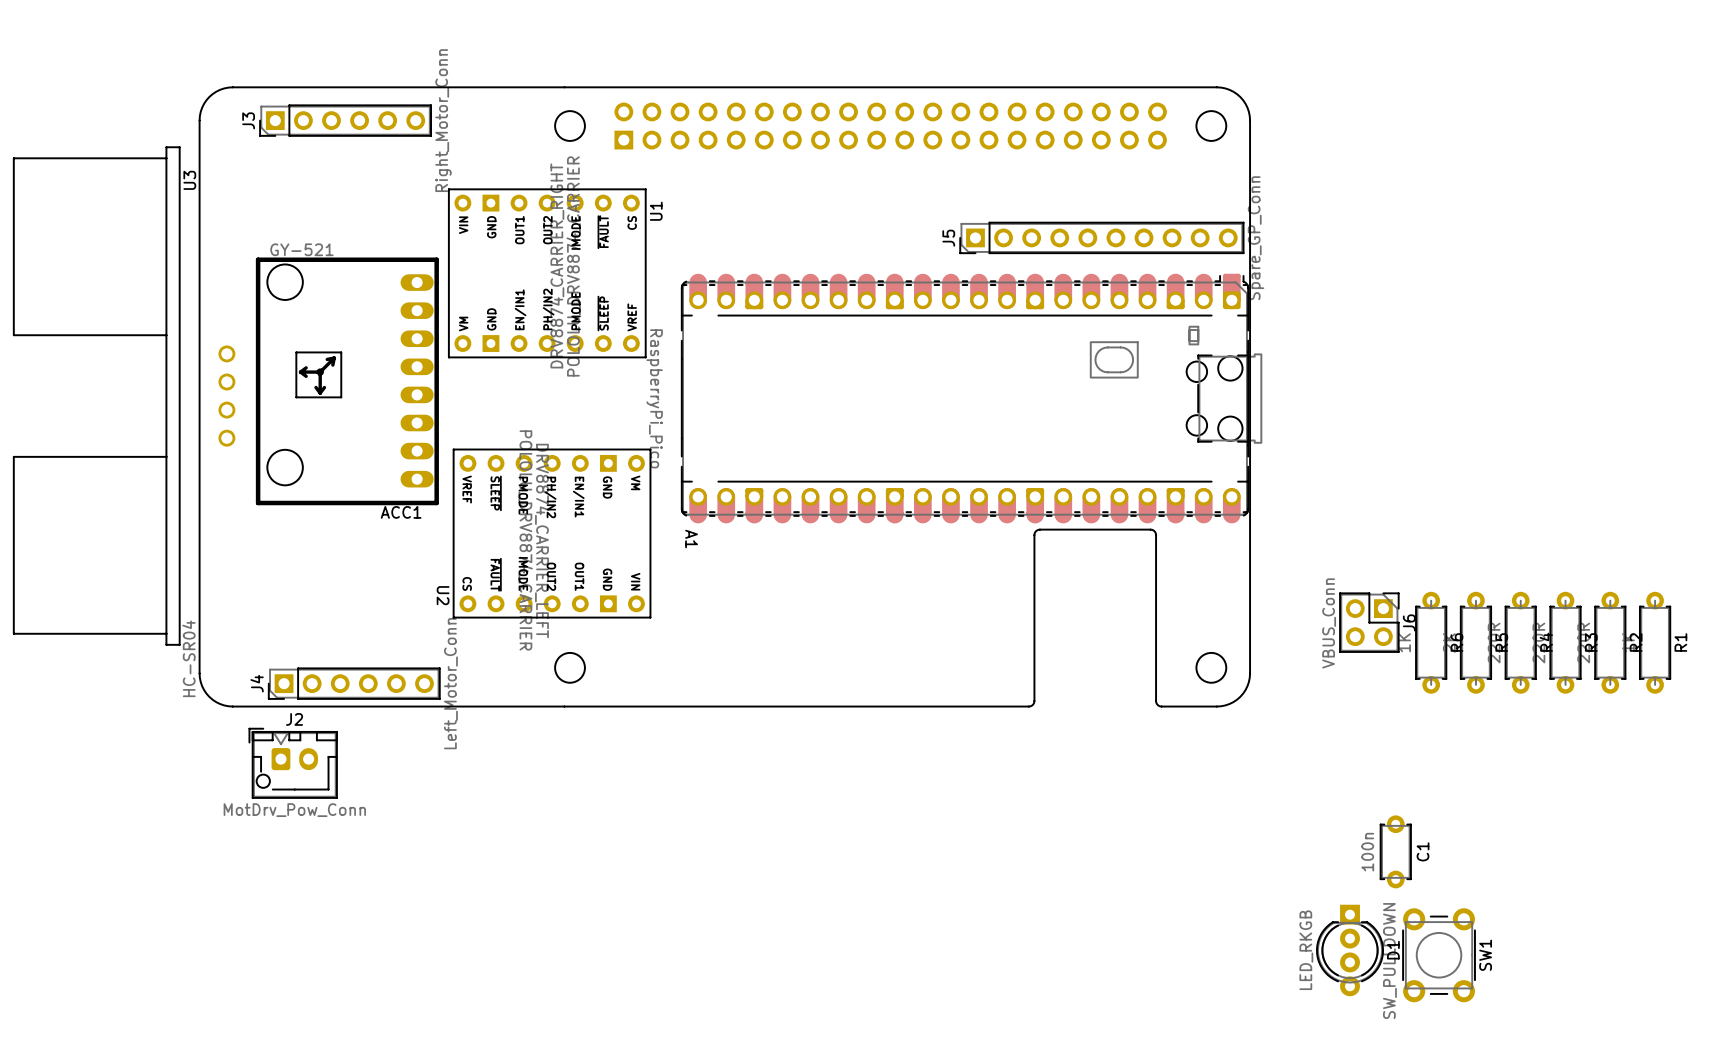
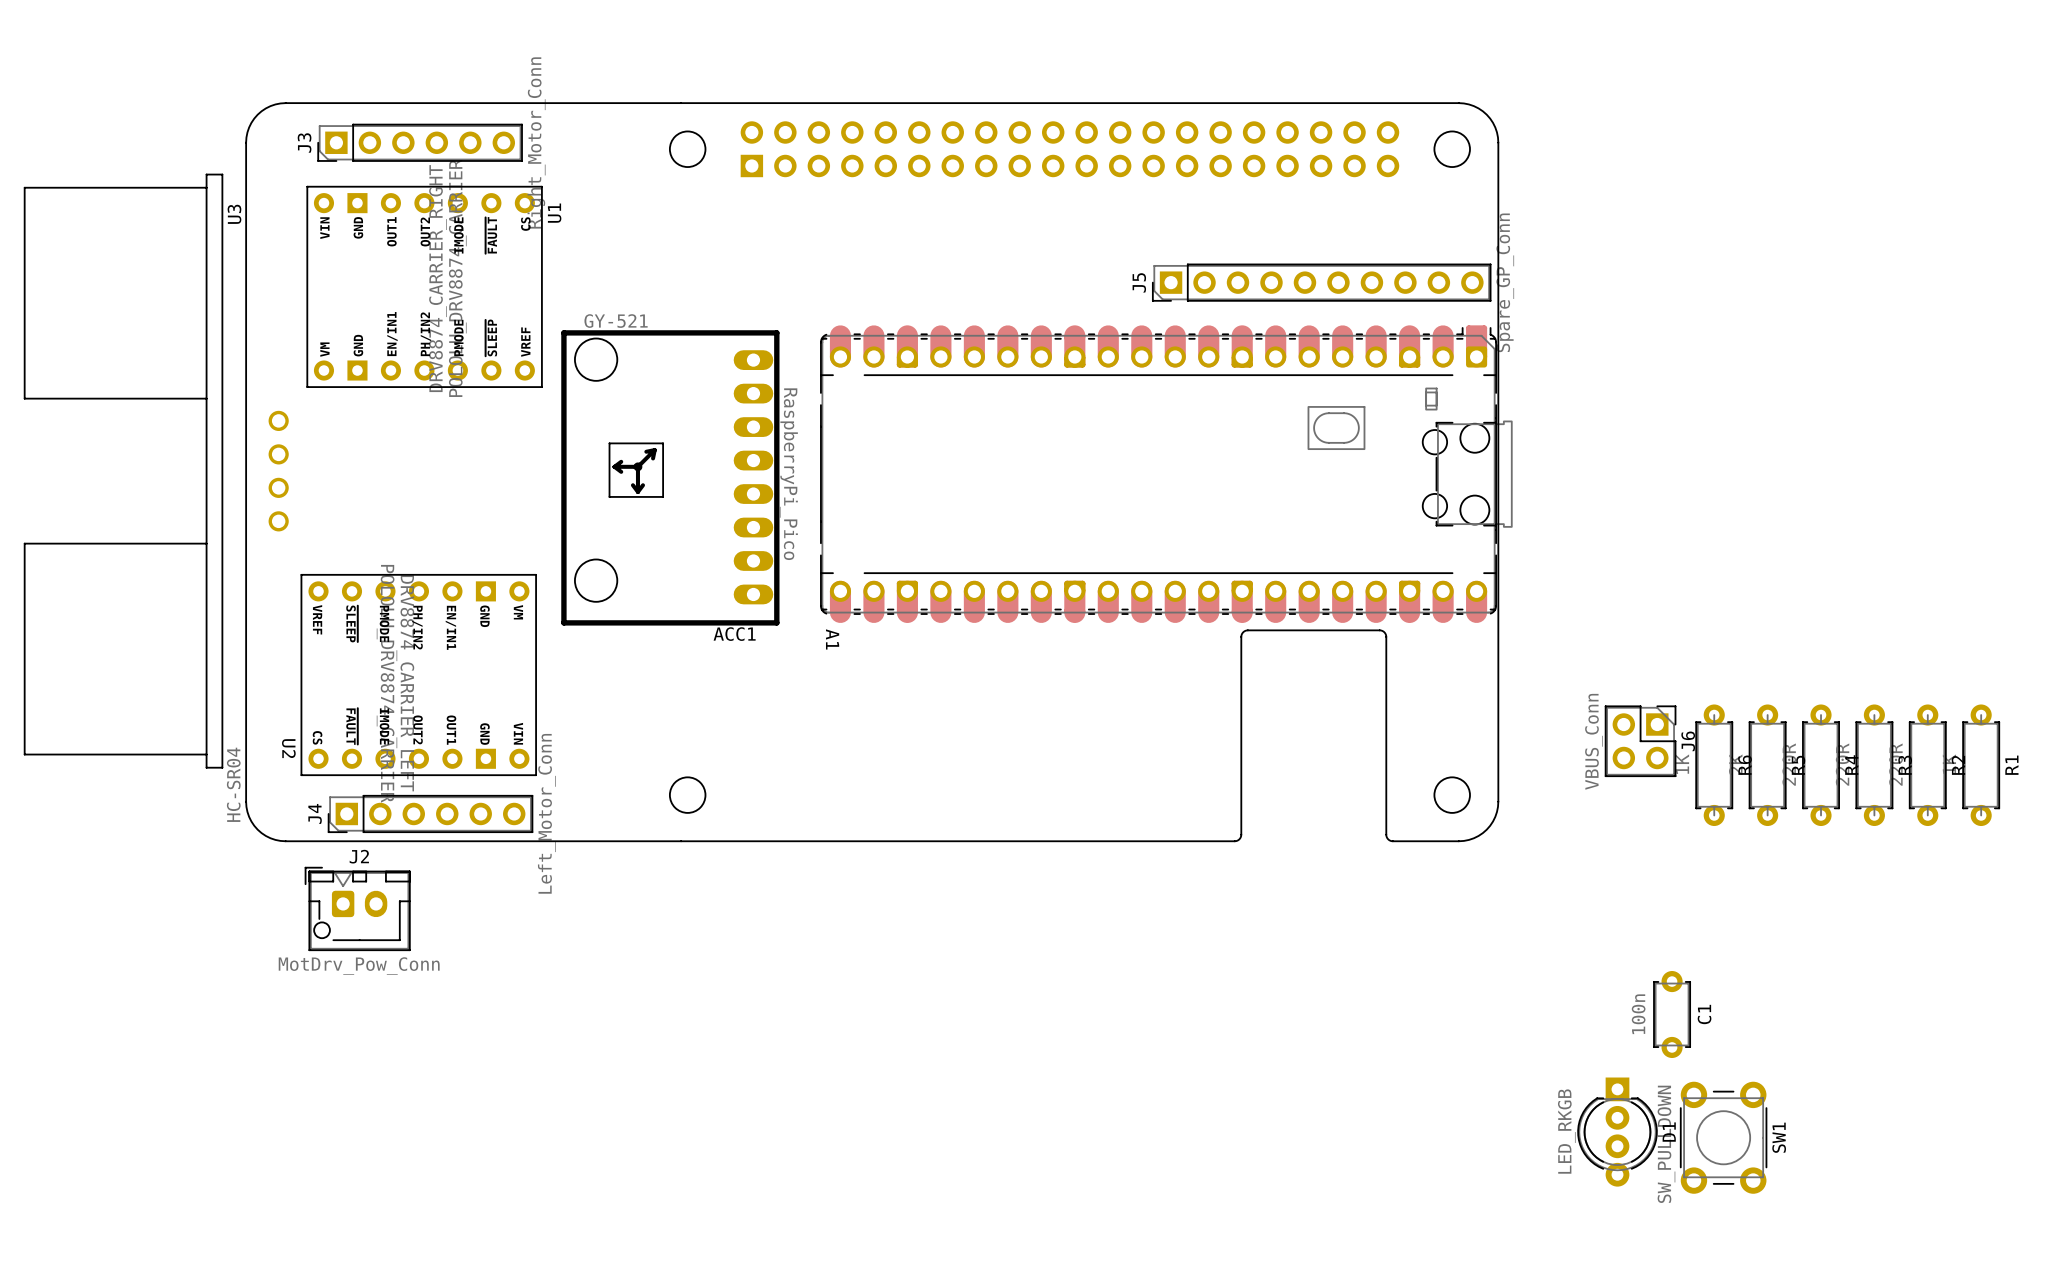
U1 position: (547, 273) -> (424, 286)
ACC1 position: (347, 381) -> (670, 477)
U2 position: (552, 533) -> (418, 675)

